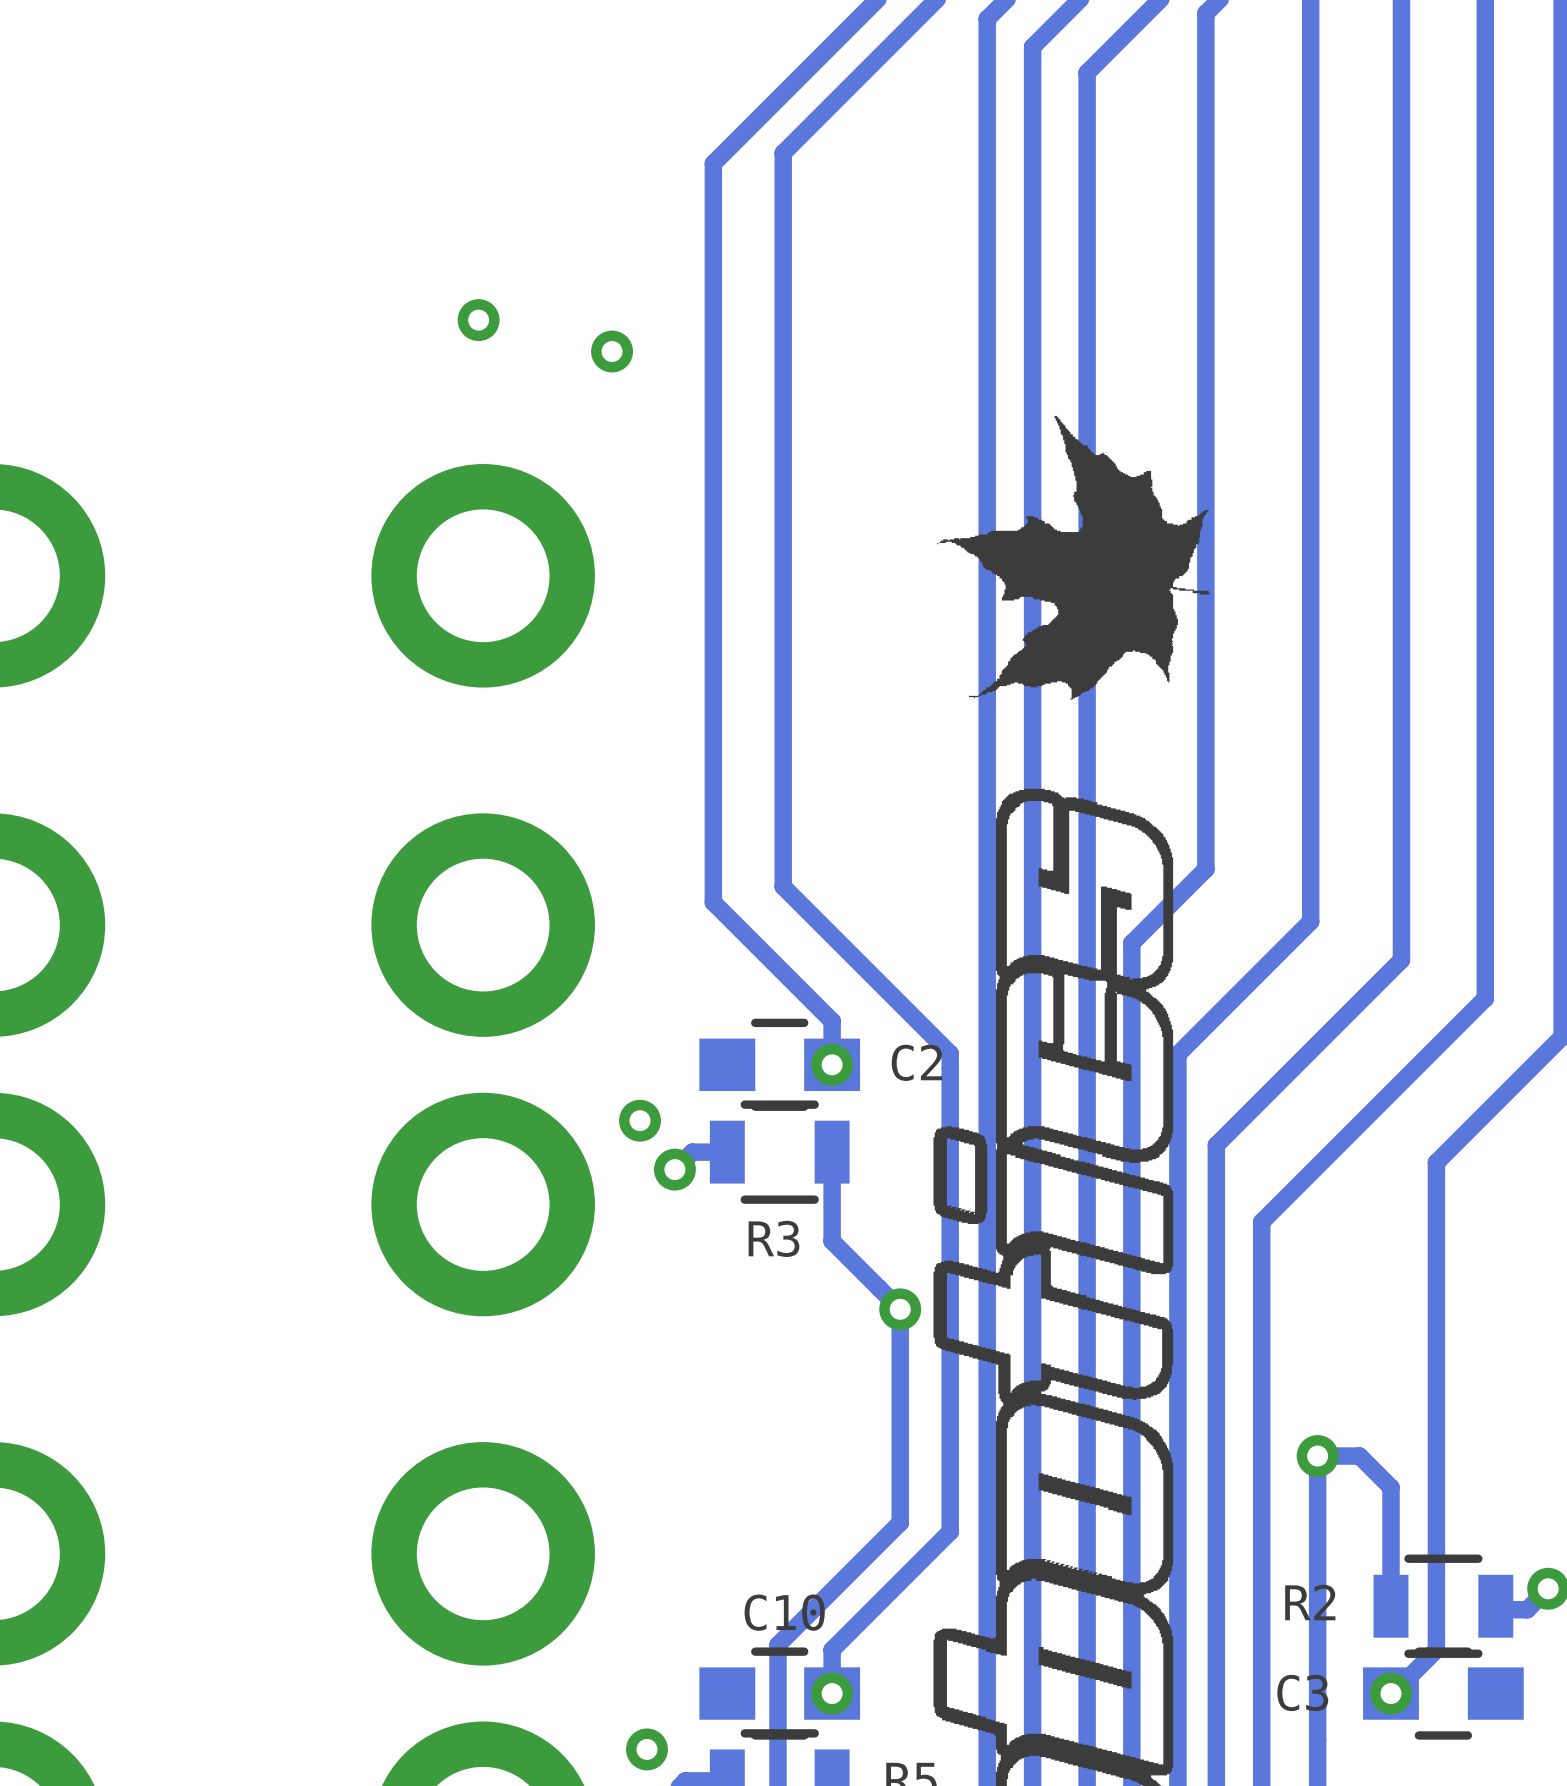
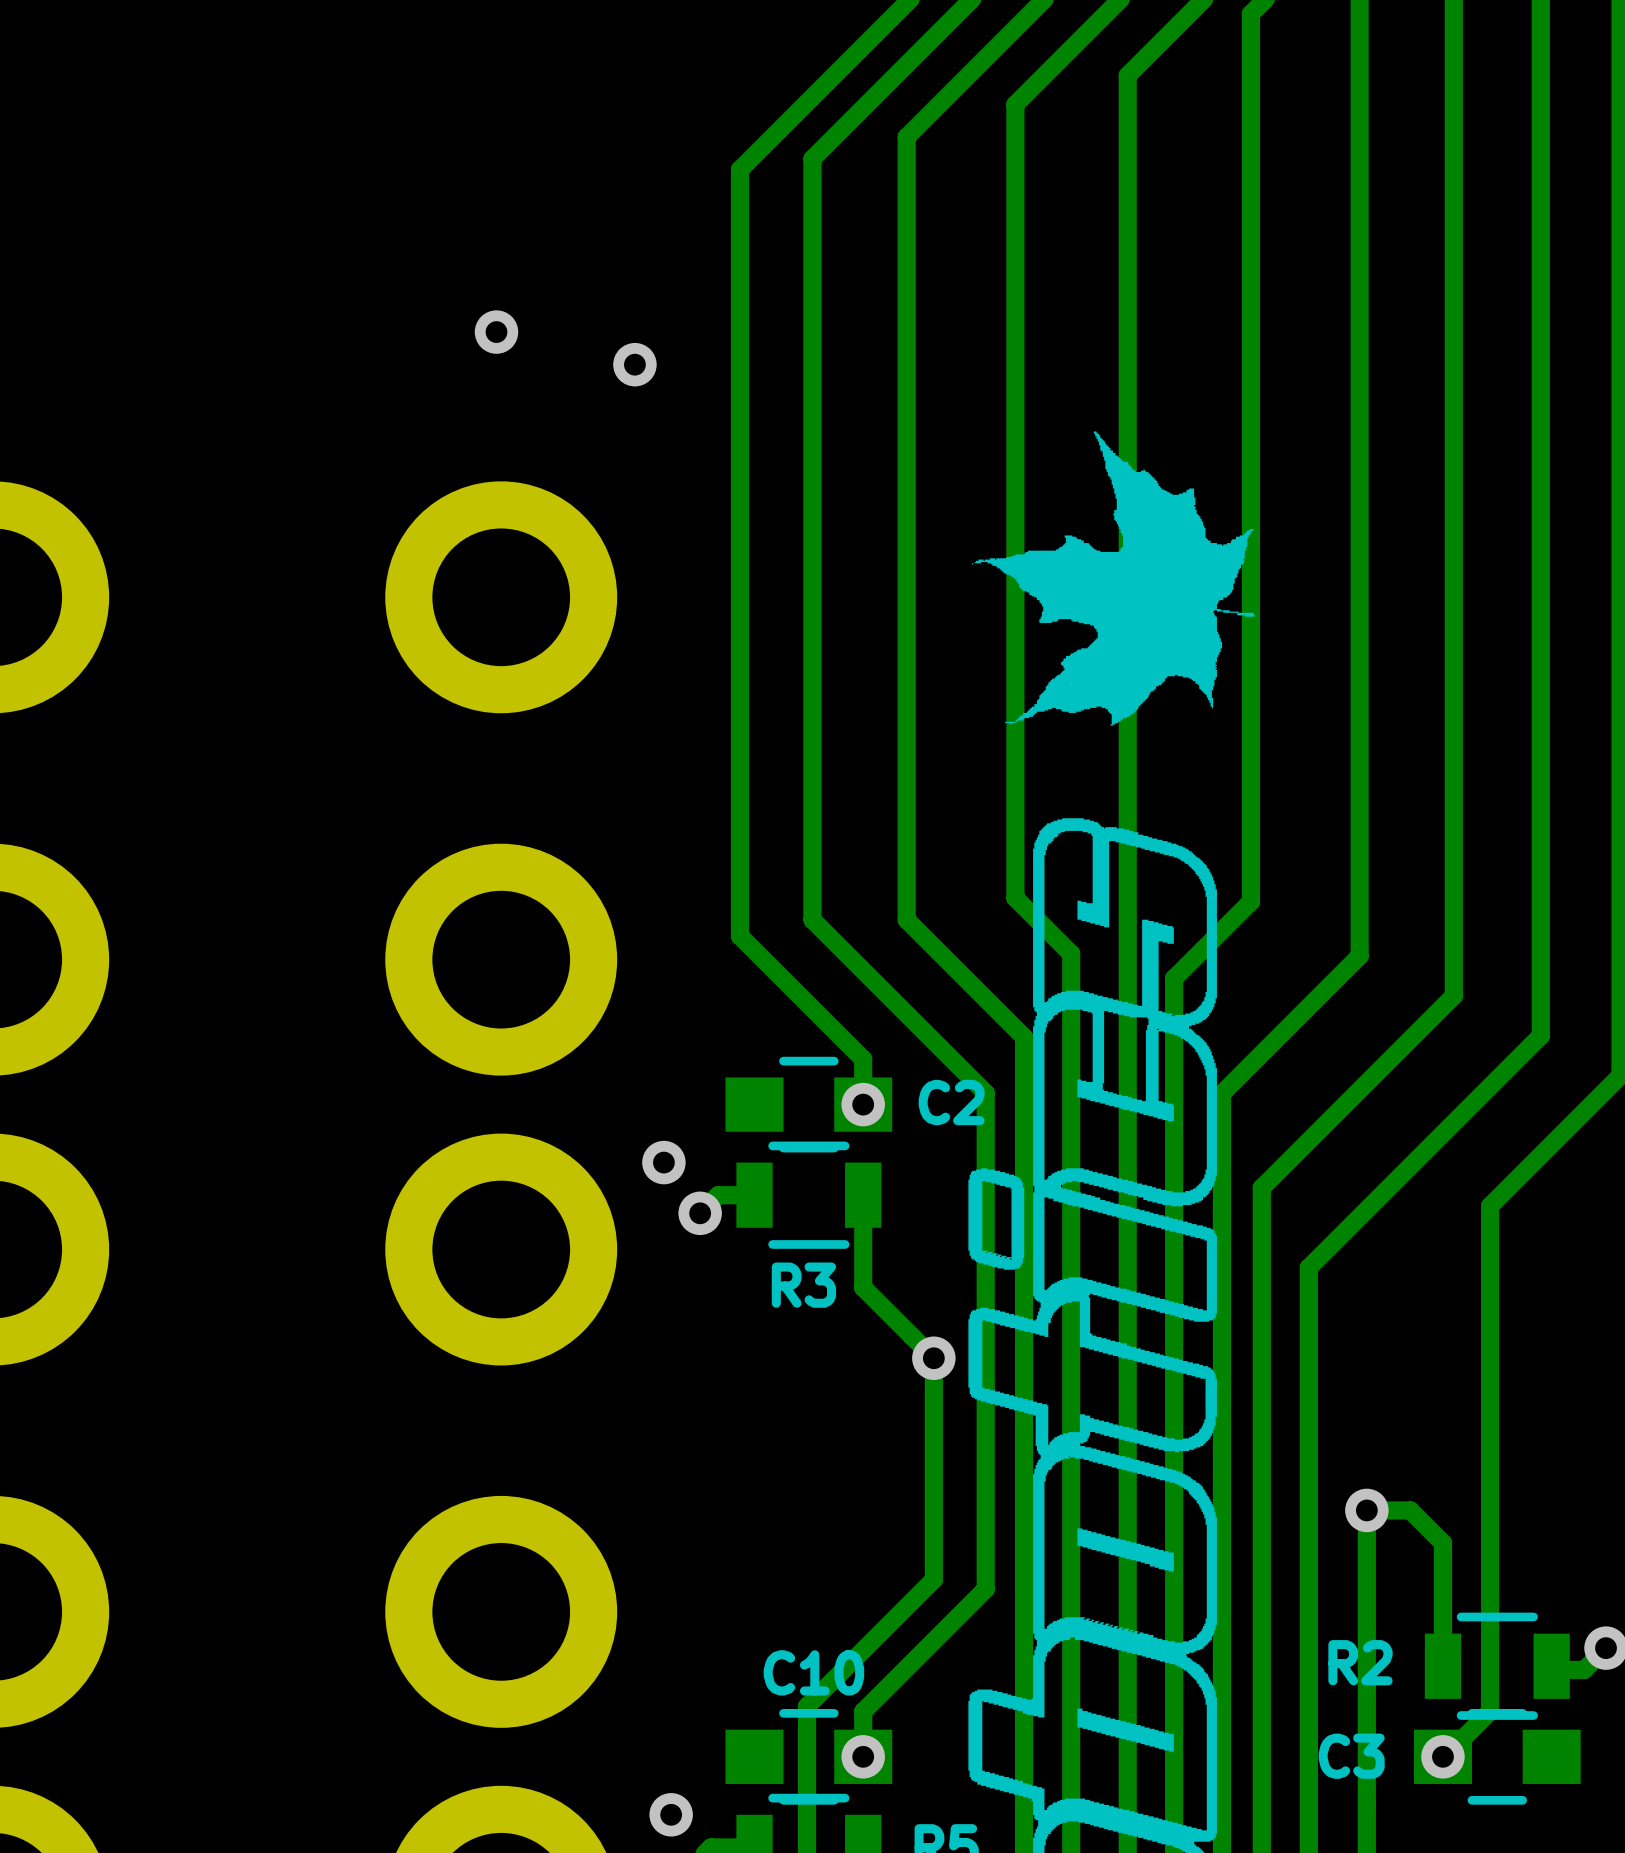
track: (987, 19) (987, 999) -> (1024, 19) (906, 137) (906, 919) (1024, 1037)
track: (1032, 46) (1032, 919) -> (1071, 48) (1015, 104) (1015, 898) (1071, 953)

